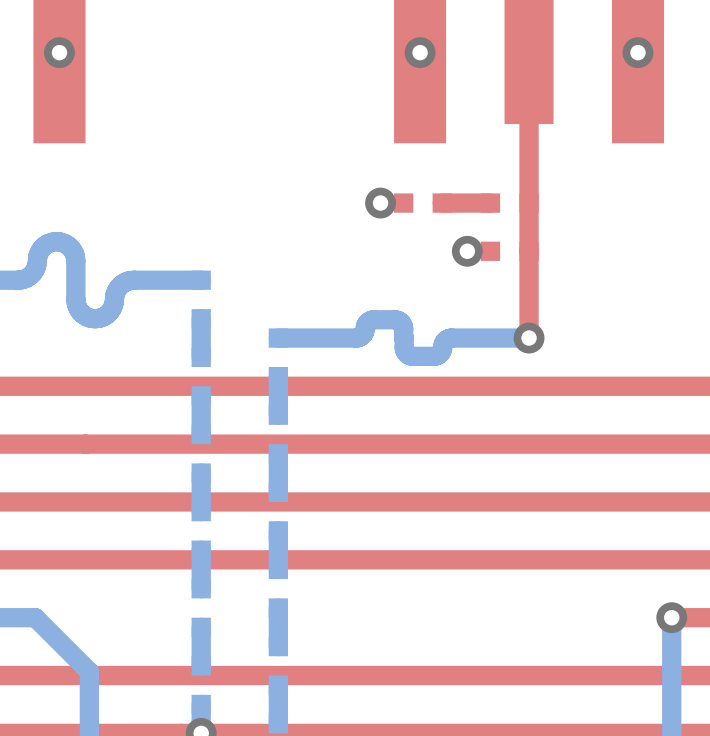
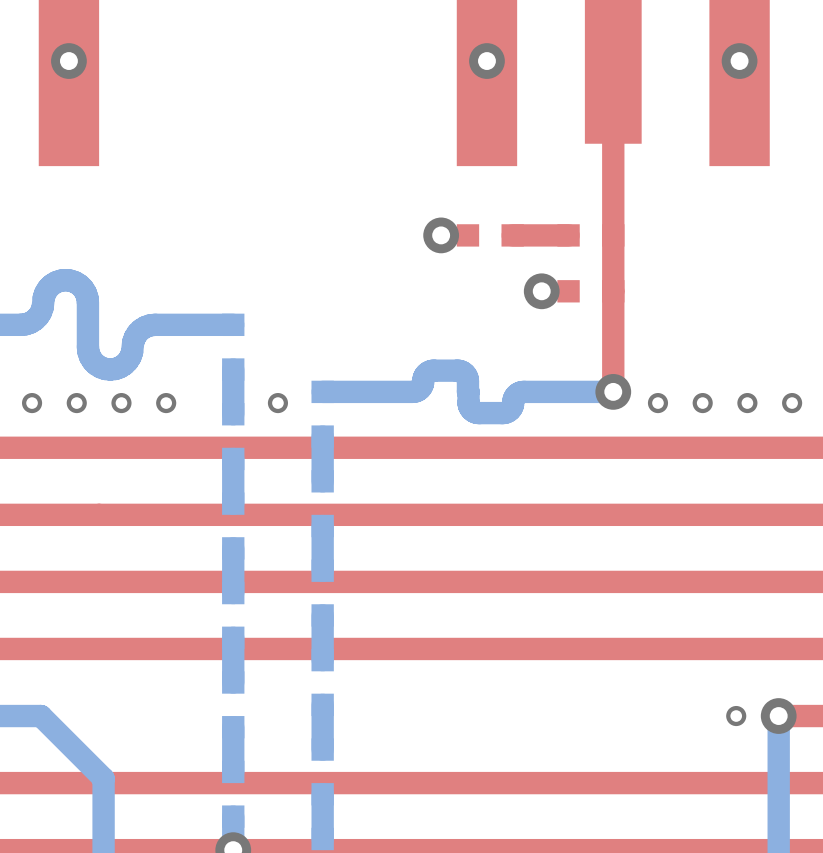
via: none -> (32, 403)
via: none -> (76, 403)
via: none -> (121, 403)
via: none -> (166, 403)
via: none -> (277, 403)
via: none -> (657, 403)
via: none -> (702, 403)
via: none -> (747, 403)
via: none -> (792, 403)
via: none -> (736, 716)

